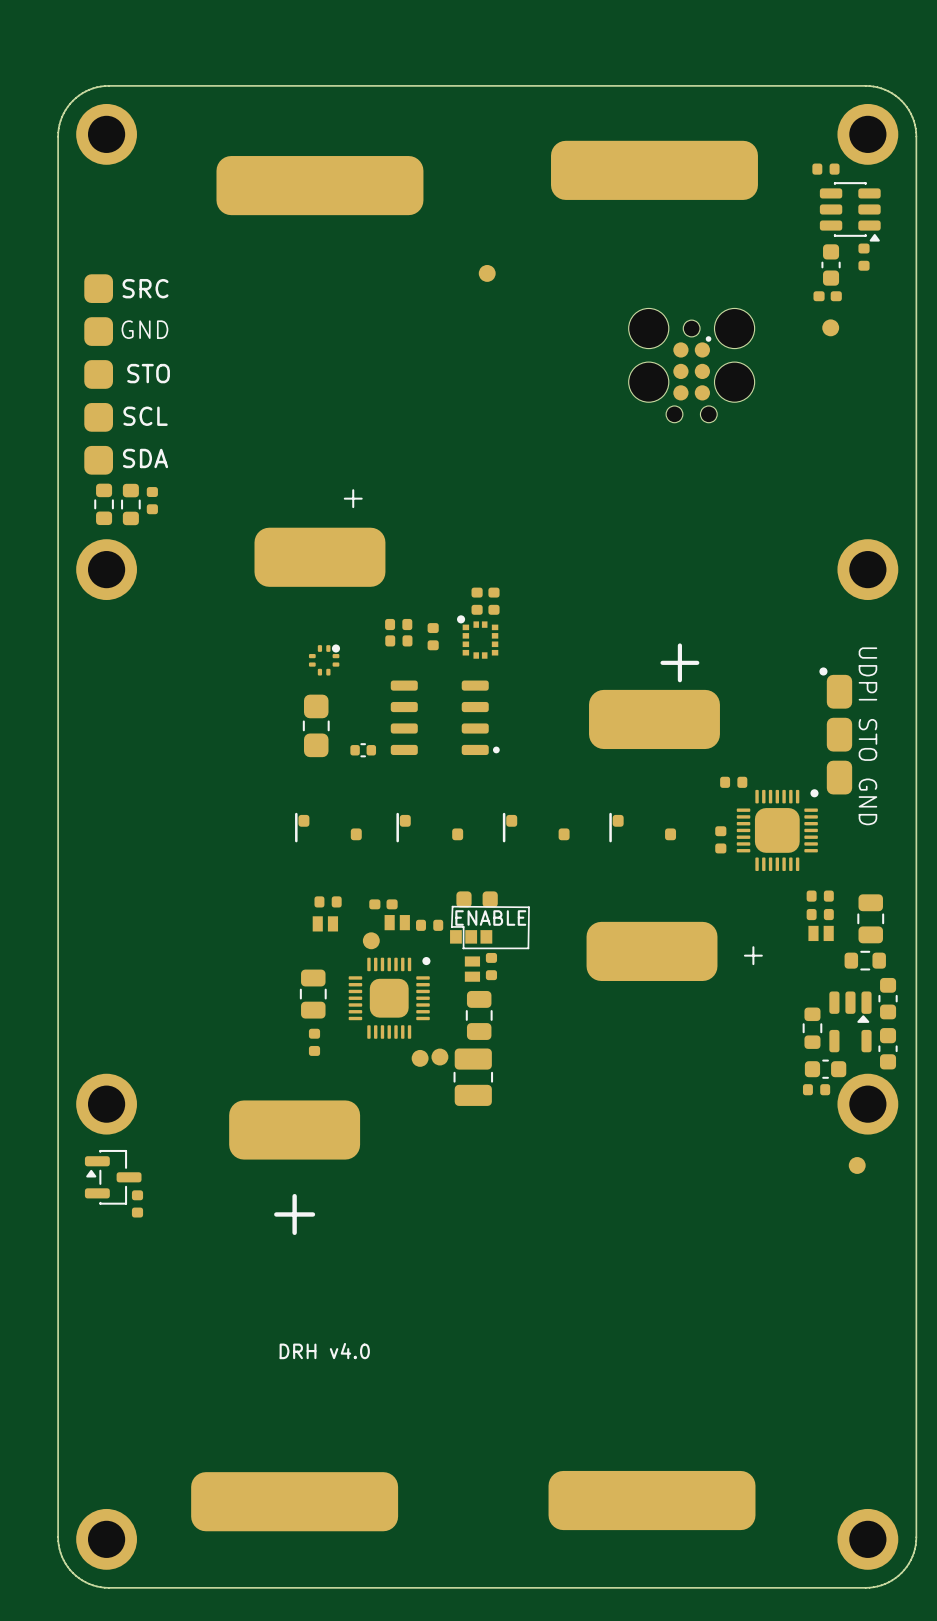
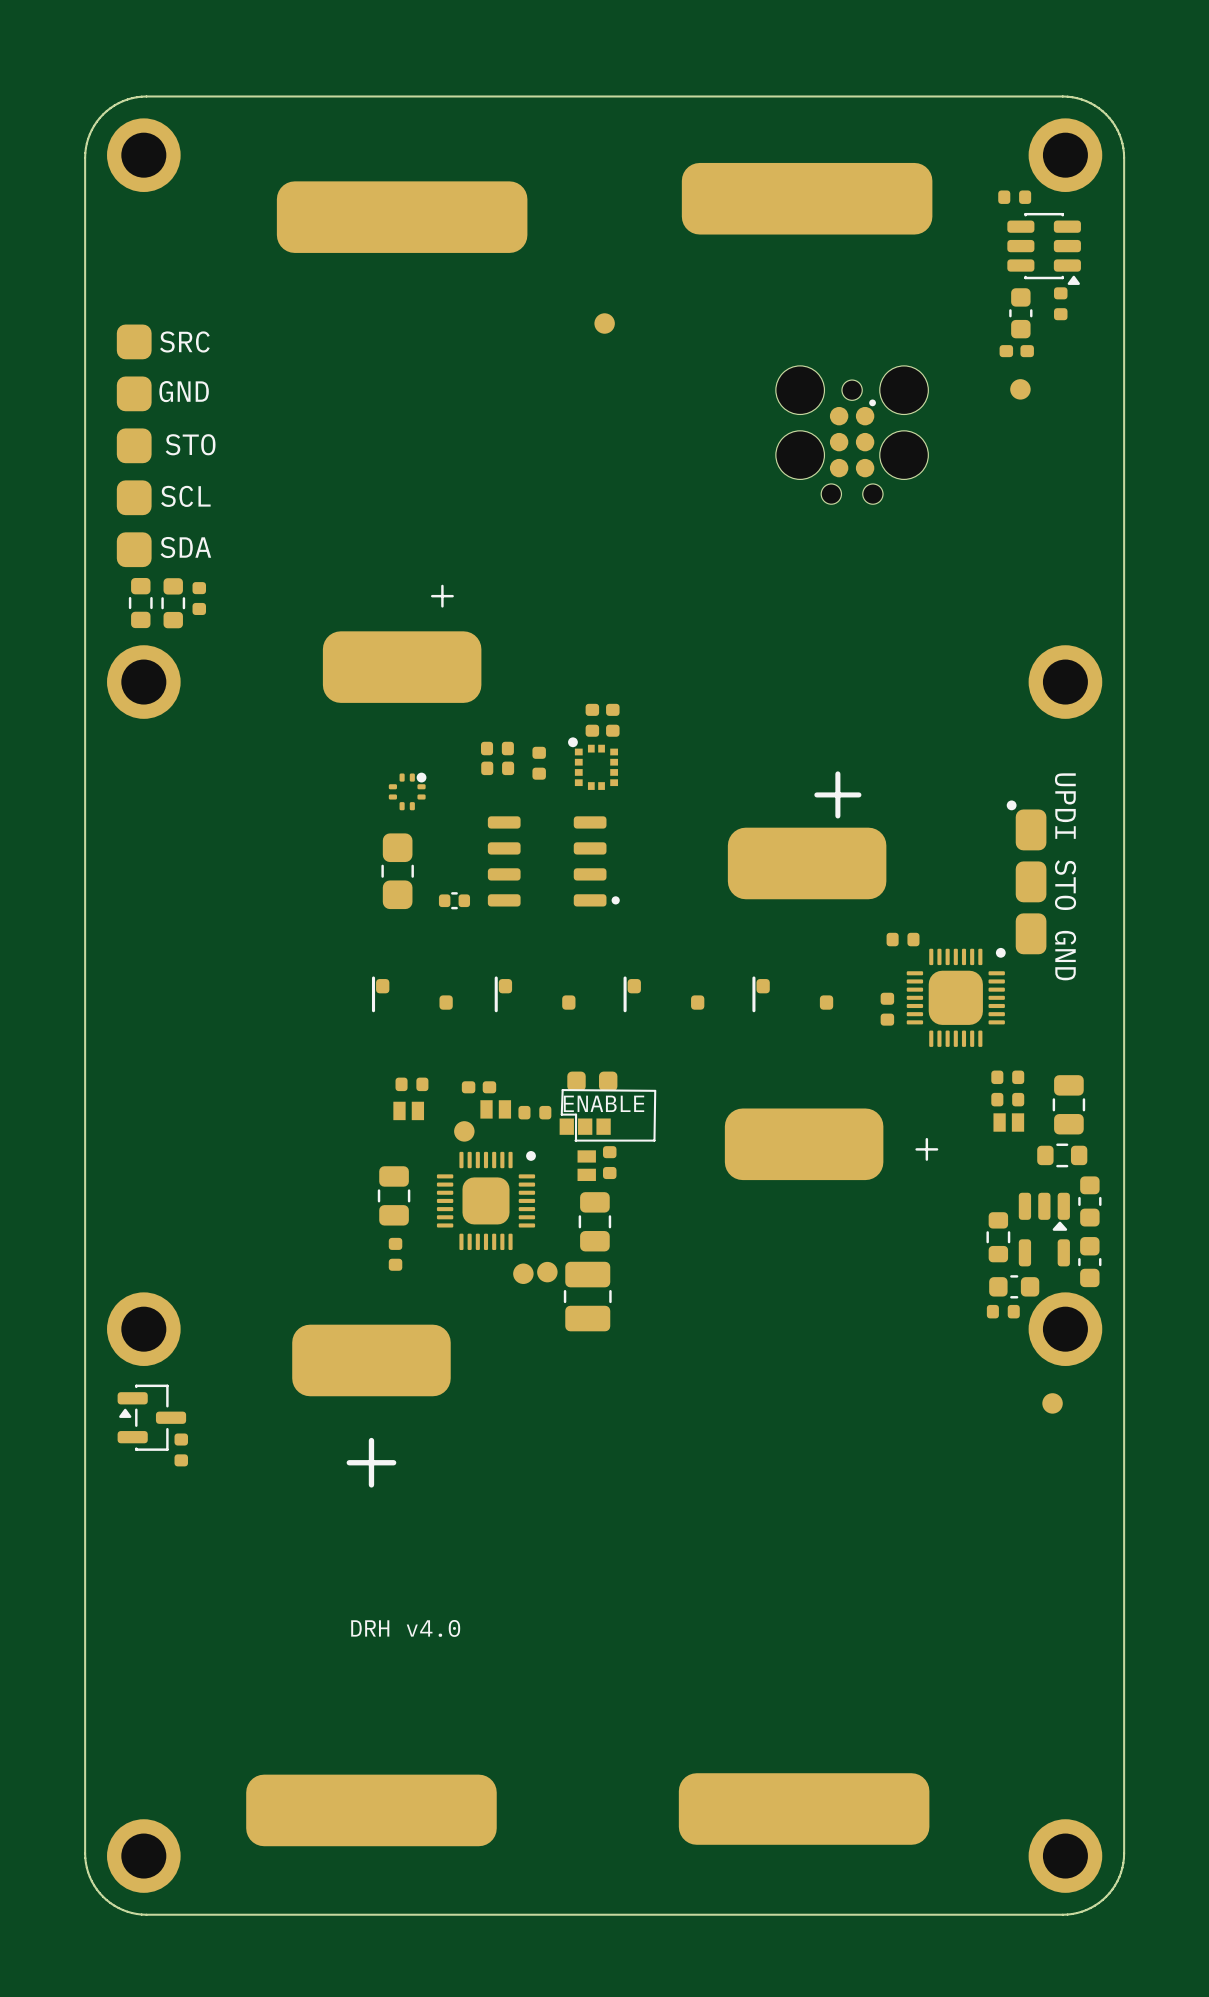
part text: UDPI STO GND (867, 736) -> UPDI STO GND (1065, 876)

